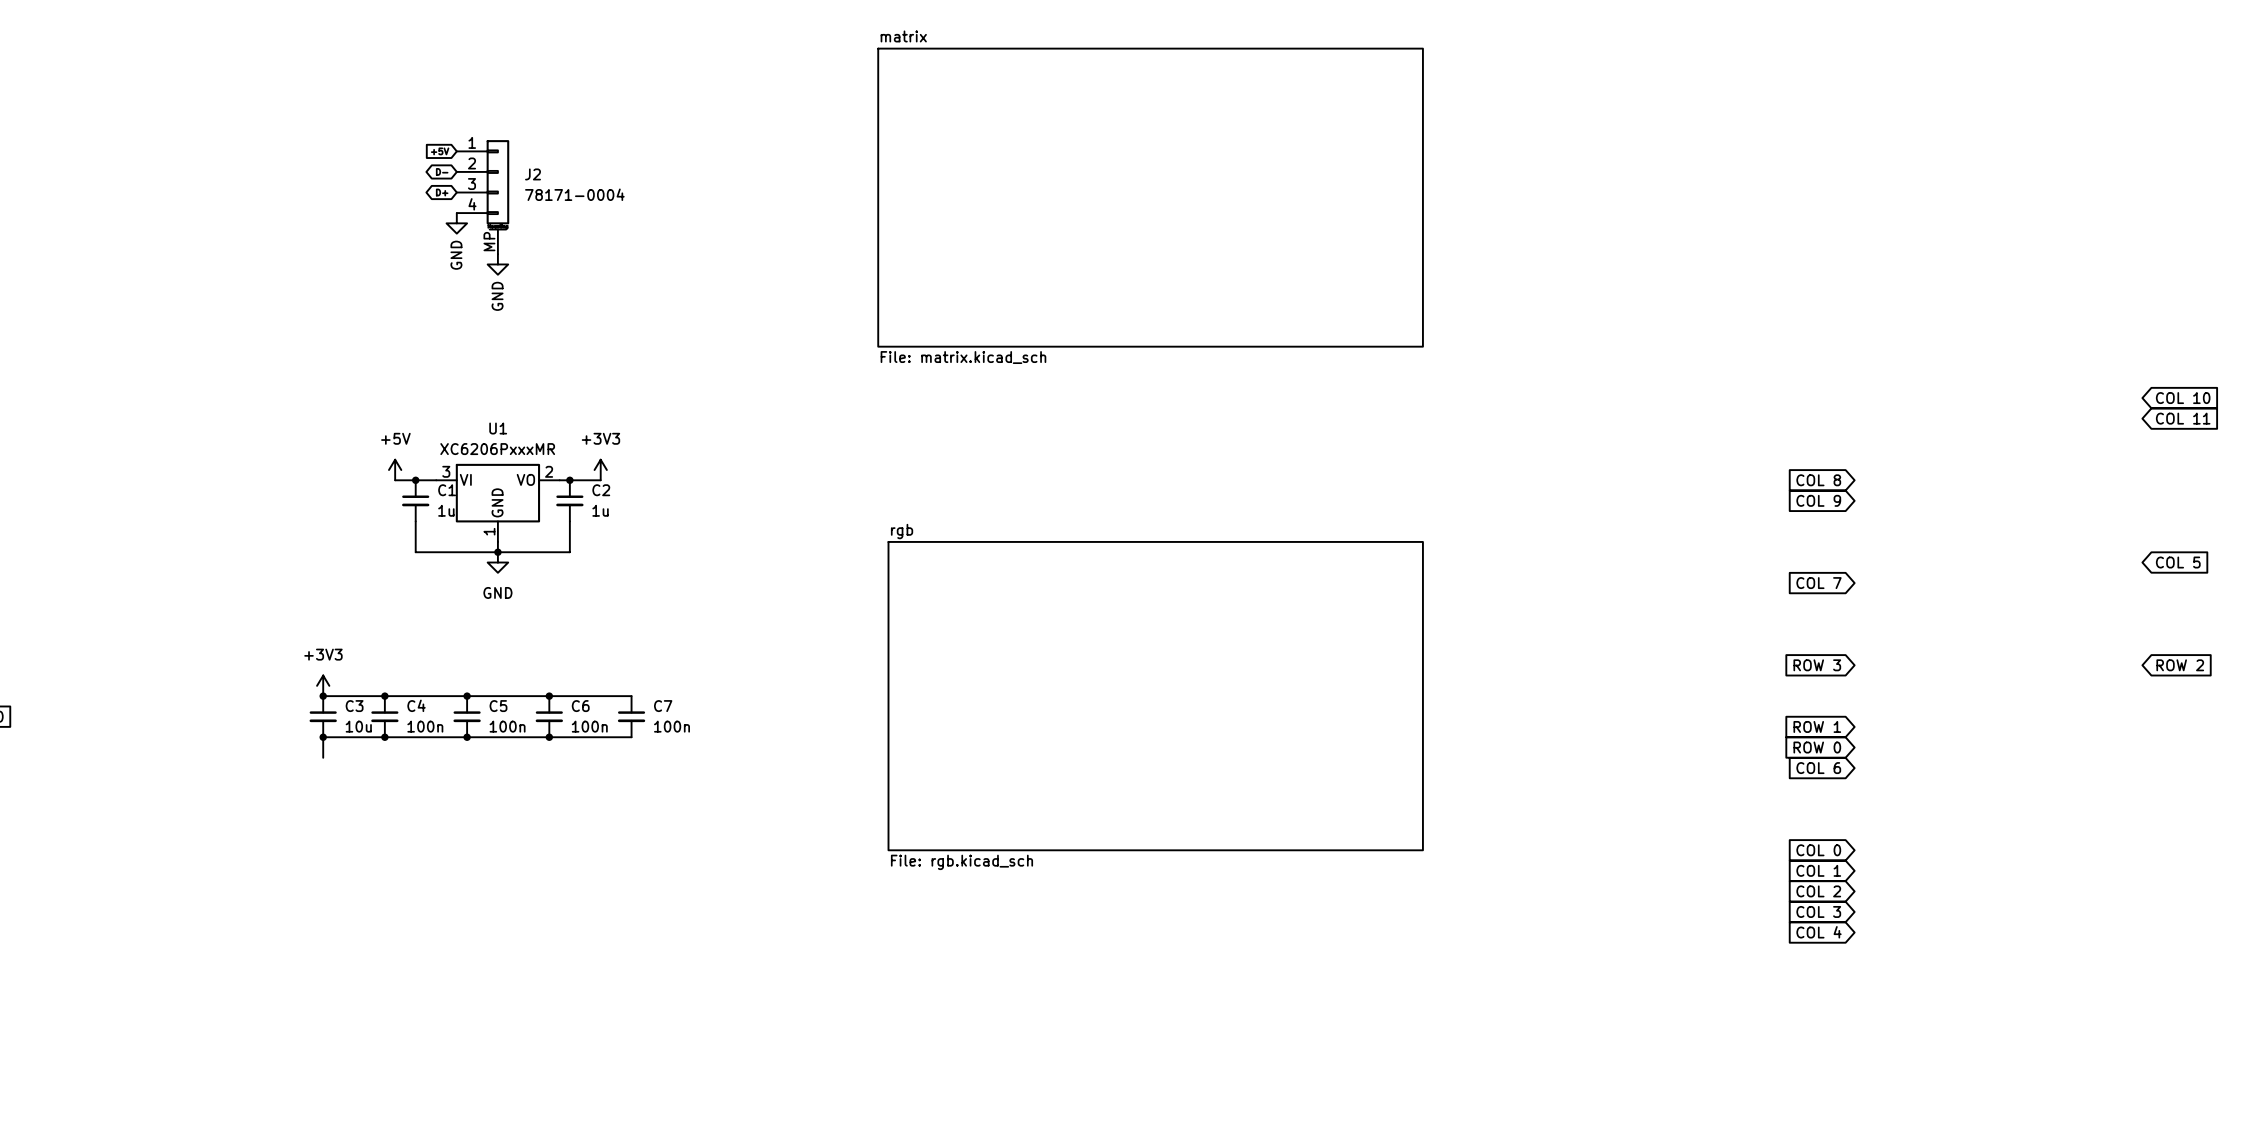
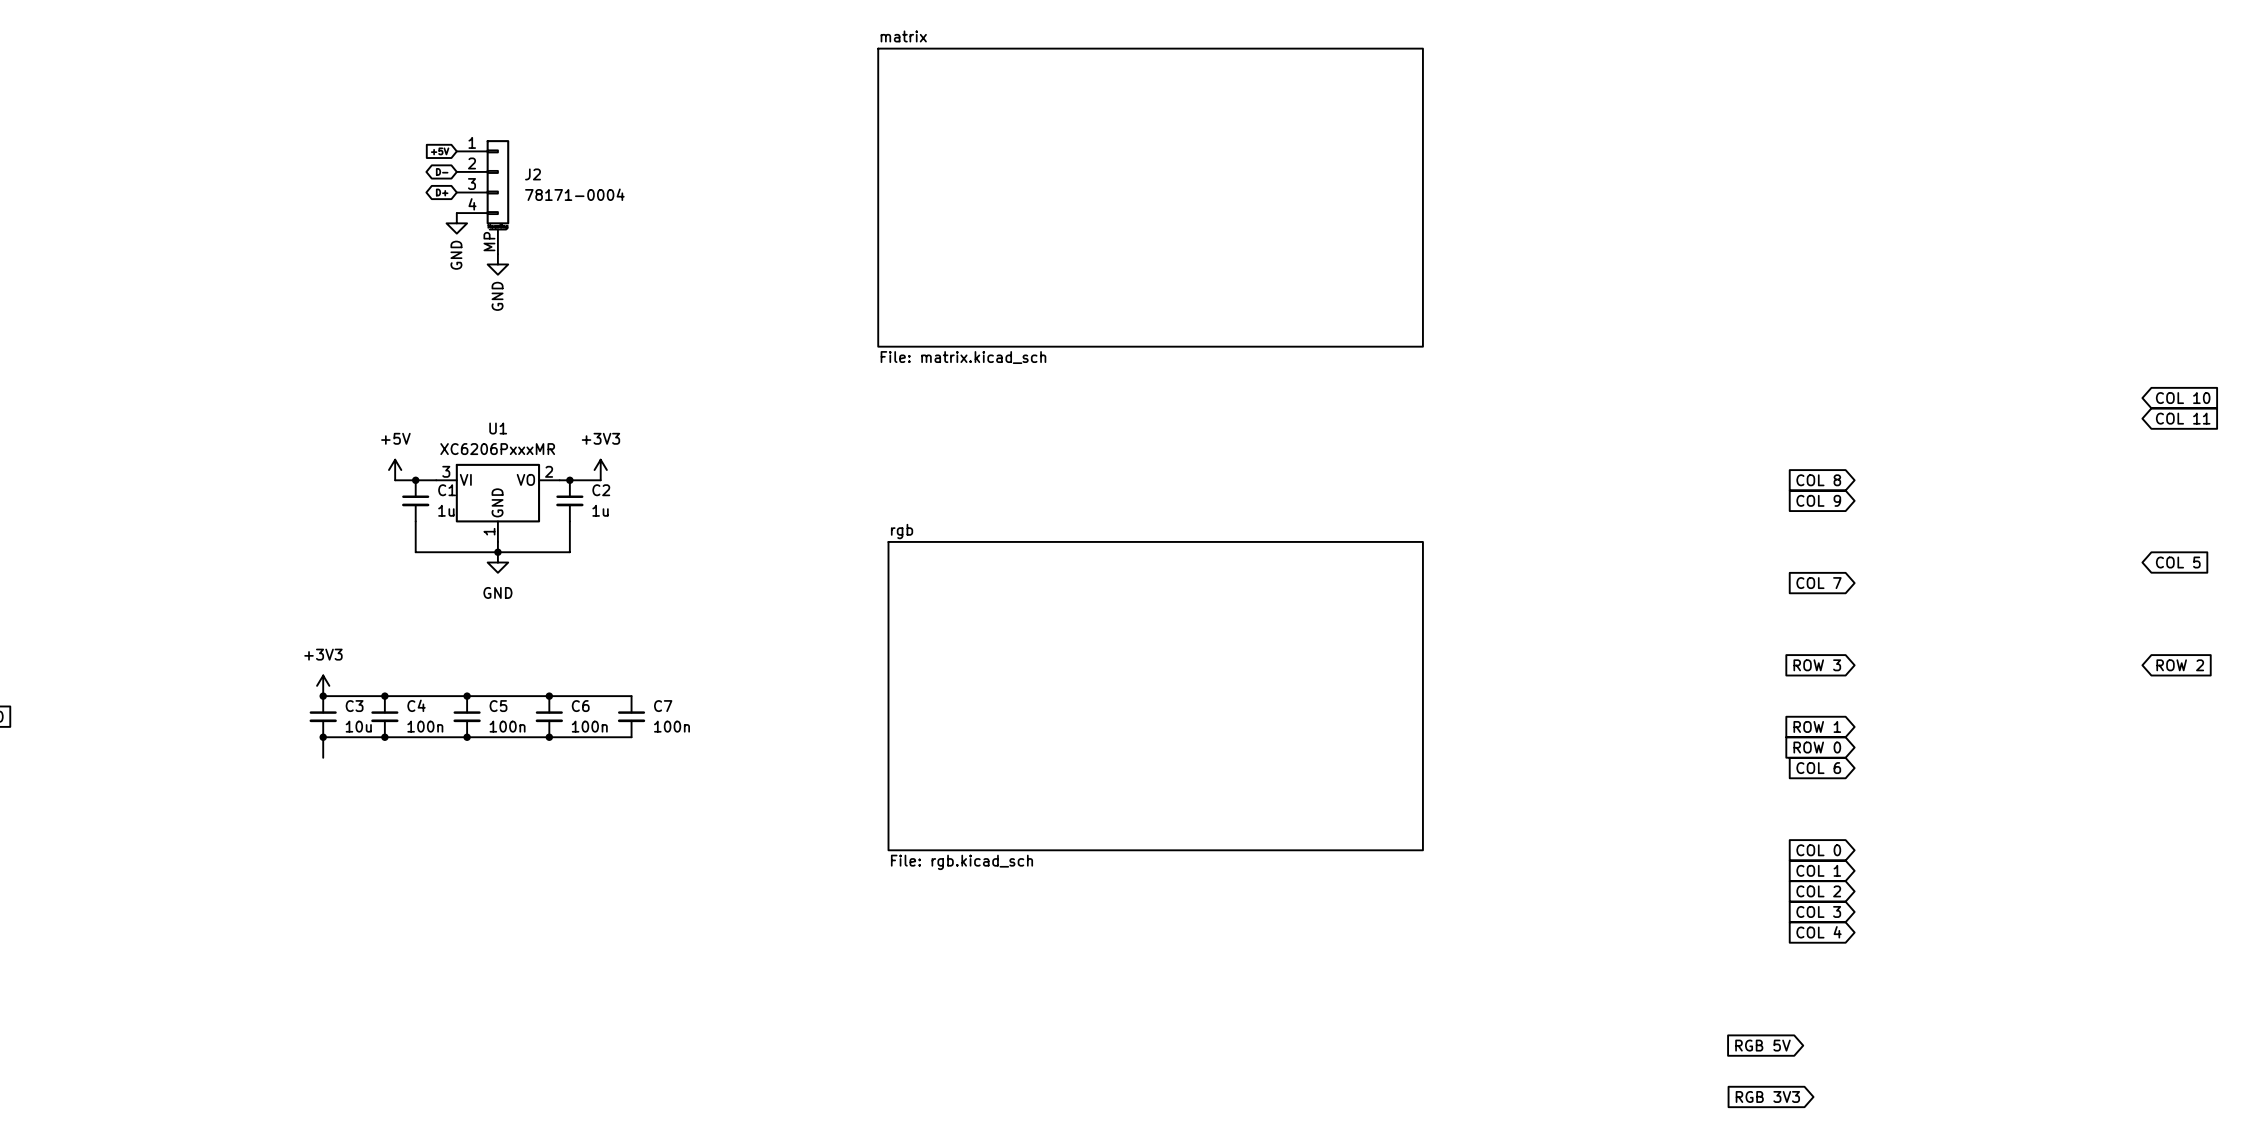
global label: none -> RGB 5V (1762, 1045)
global label: none -> RGB 3V3 (1767, 1096)

